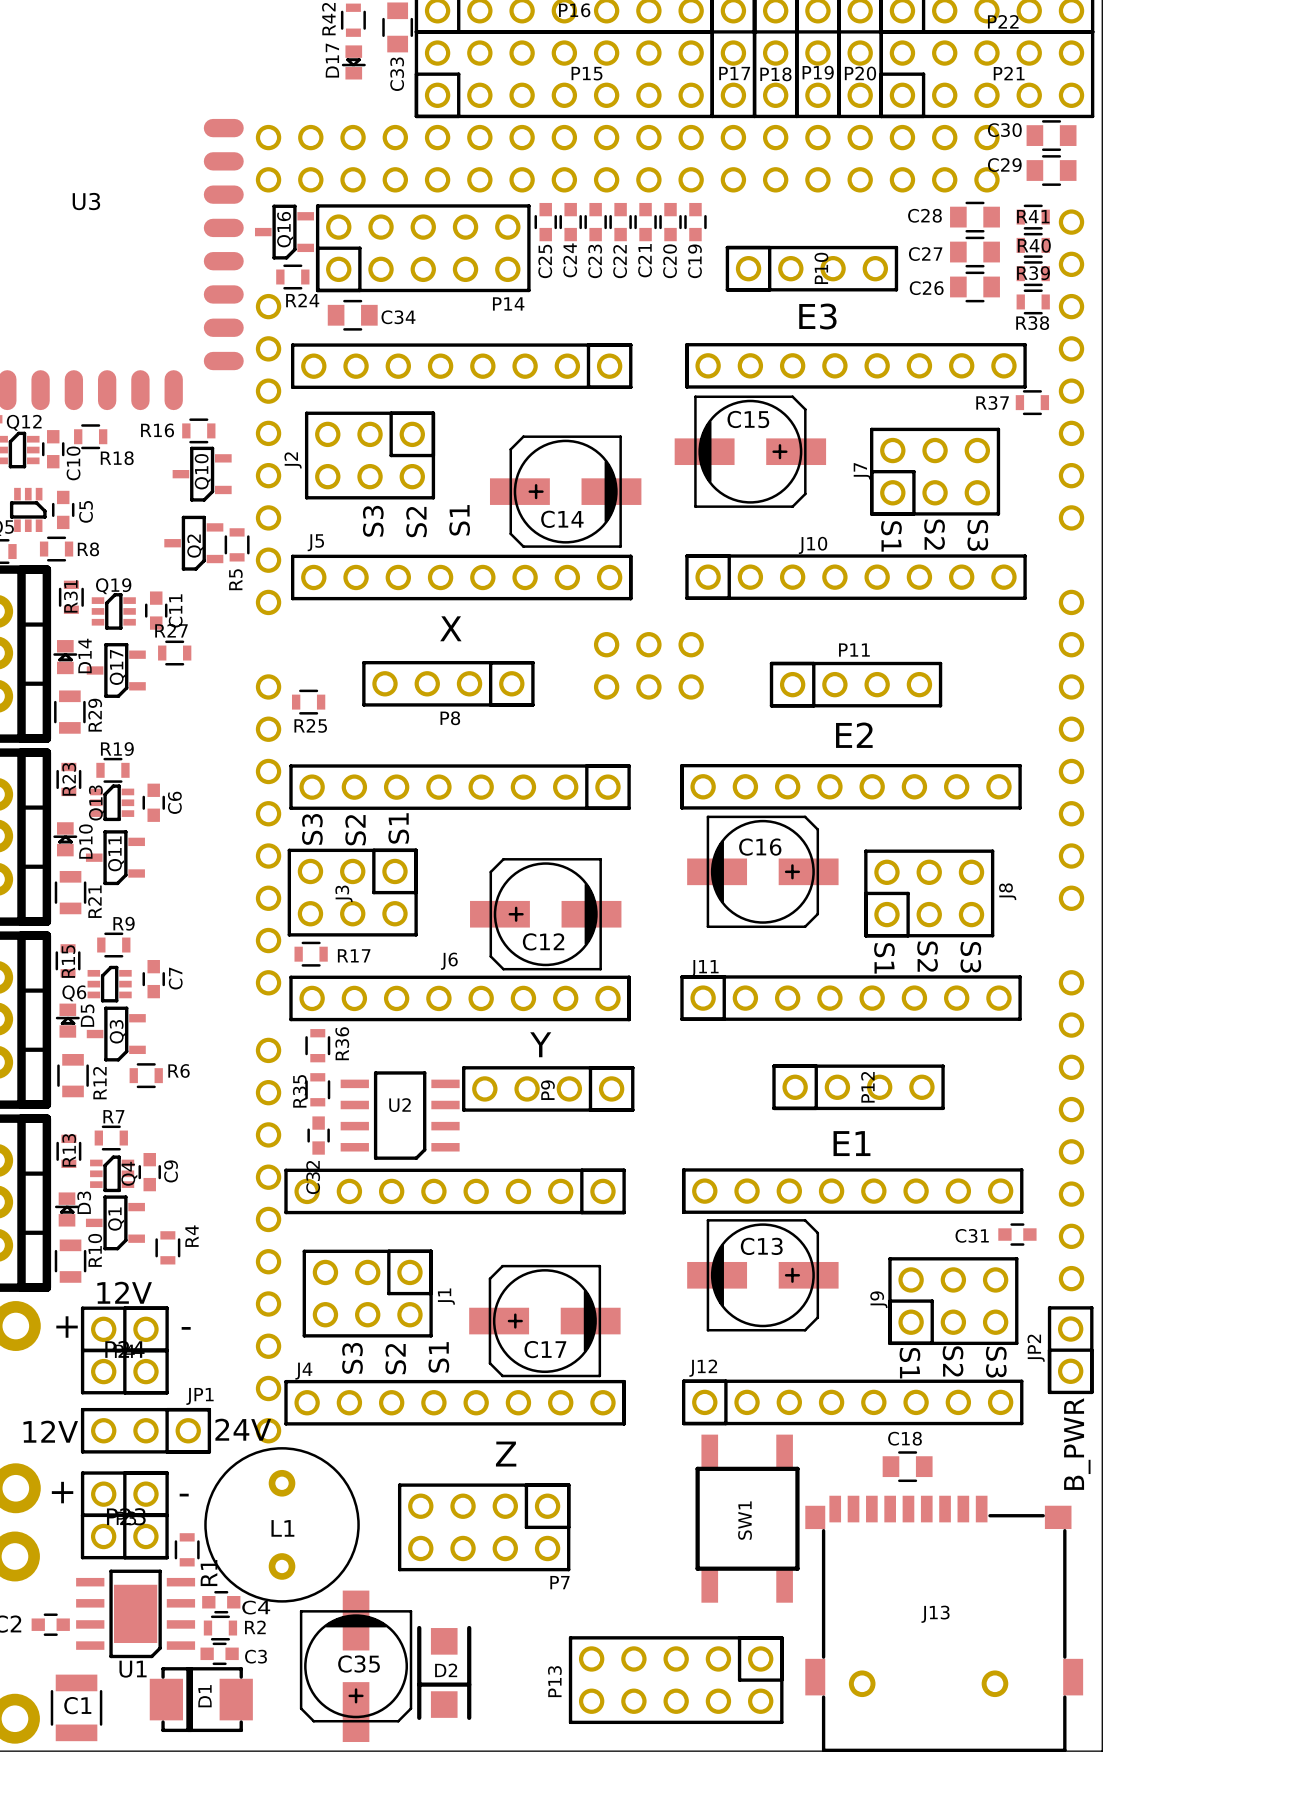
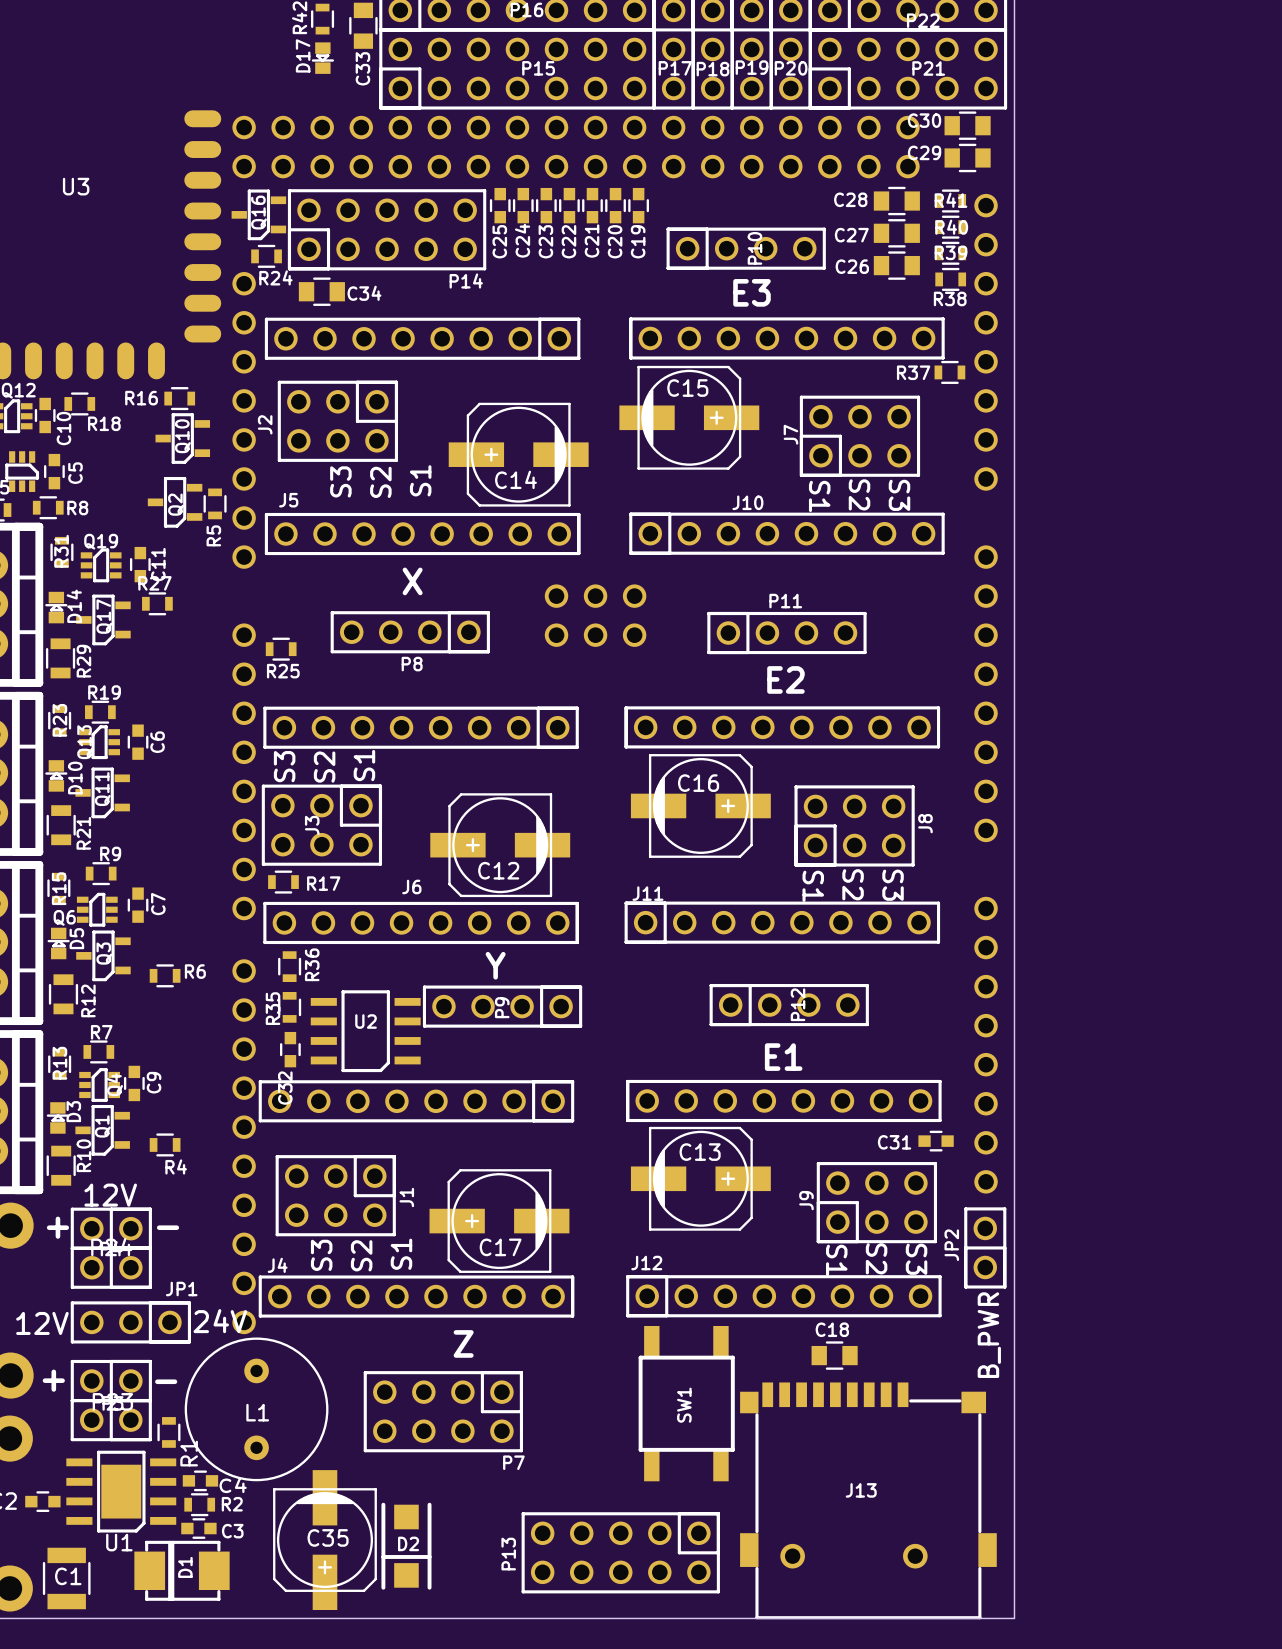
R6 position: (146, 1075) -> (165, 975)
R4 rotation: 0° (167, 1247) -> 90° clockwise (165, 1144)

